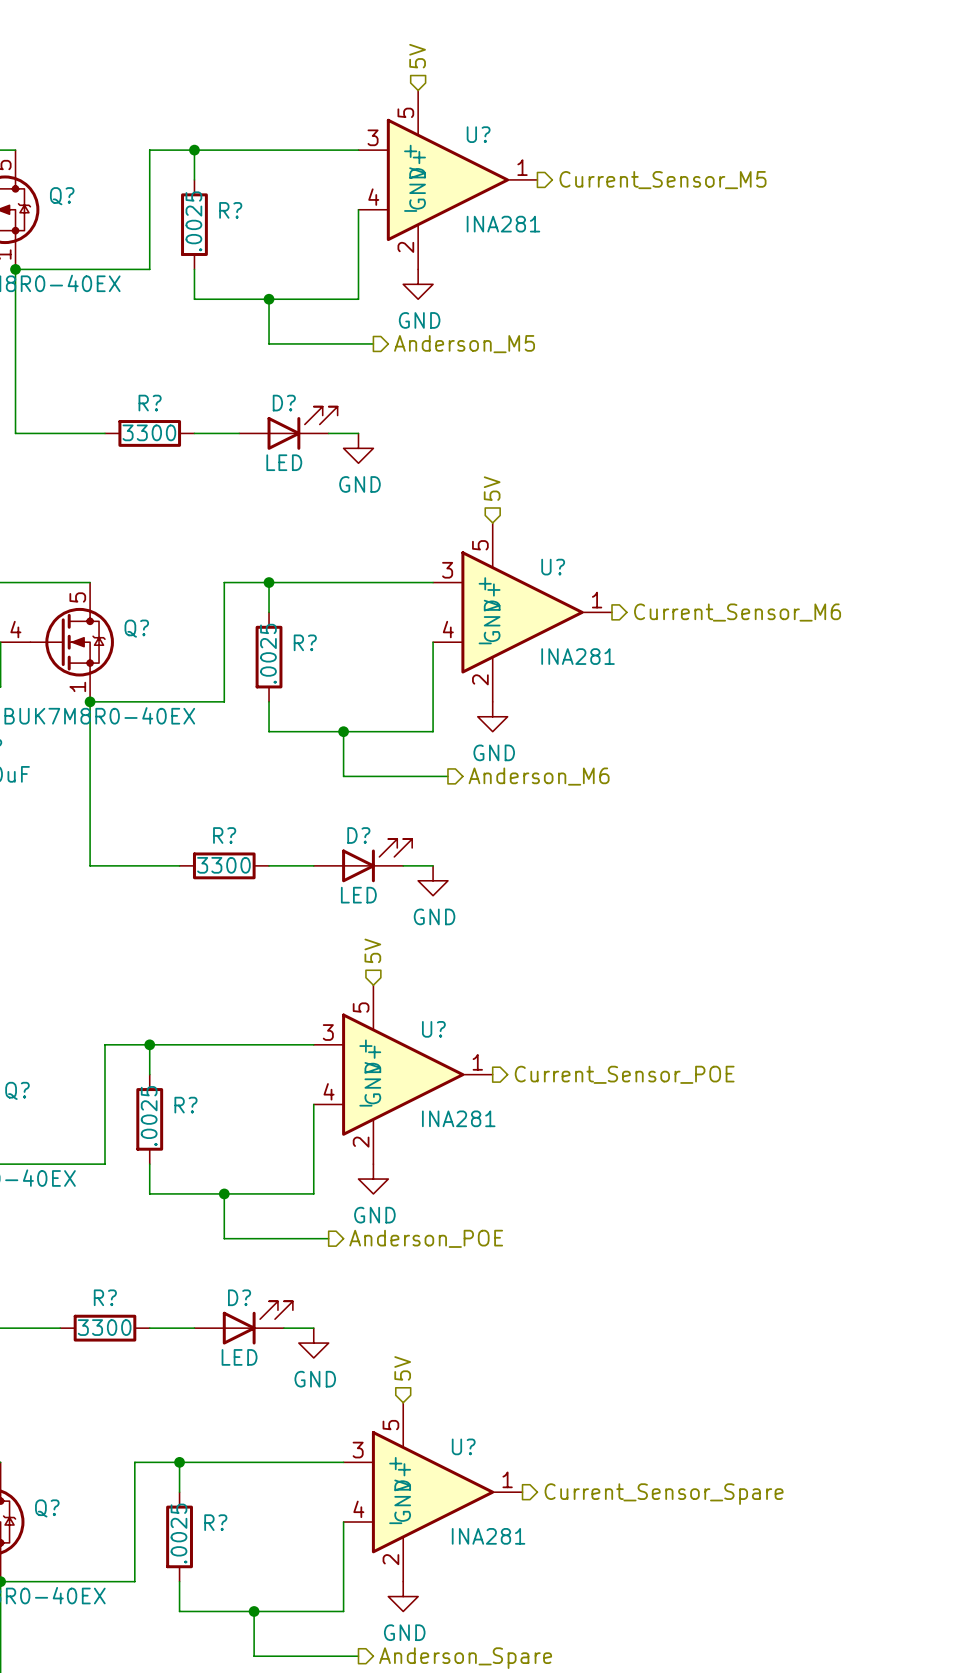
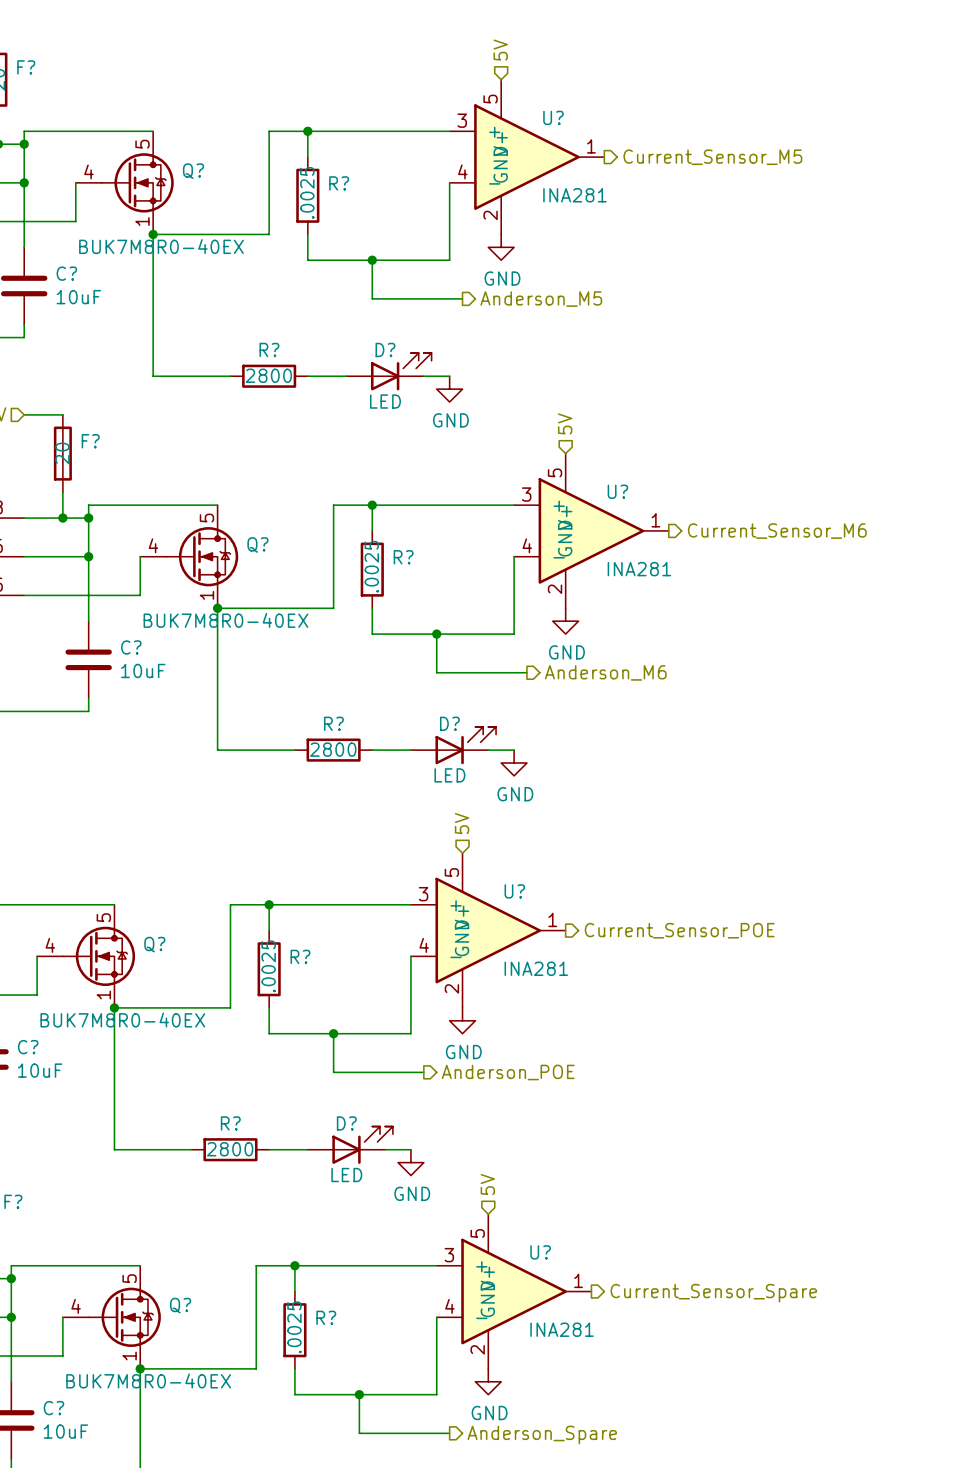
R? value: 3300 (149, 432) -> 2800 (268, 375)
R? value: 3300 (223, 865) -> 2800 (333, 749)
R? value: 3300 (104, 1327) -> 2800 (230, 1149)

